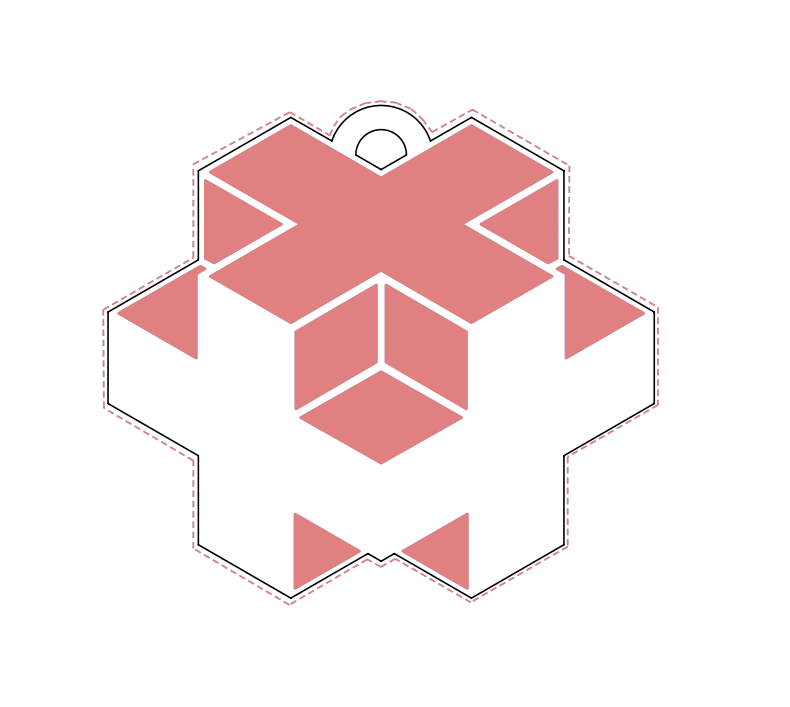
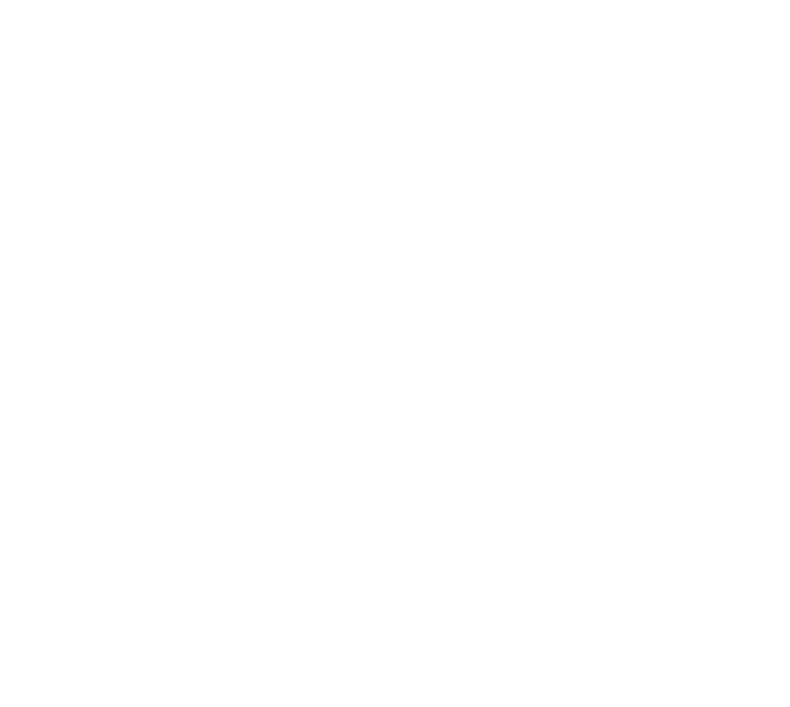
top zone outline: (380, 101) (364, 103) (350, 109) (341, 116) (329, 135) (289, 112) (193, 164) (193, 257) (103, 309) (103, 407) (193, 460) (193, 548) (289, 604) (367, 559) (380, 566) (395, 558) (470, 602) (567, 546) (567, 456) (658, 404) (658, 307) (568, 255) (569, 165) (472, 109) (432, 132) (411, 109) (395, 102) (380, 101) -> none
board edge: (290, 117) (198, 170) (198, 259) (108, 312) (108, 403) (198, 455) (198, 544) (290, 598) (367, 553) (381, 561) (394, 553) (471, 598) (563, 544) (563, 455) (654, 403) (654, 312) (563, 259) (563, 170) (471, 117) (430, 140) (421, 124) (411, 115) (400, 109) (387, 105) (368, 107) (350, 115) (341, 124) (331, 140) (290, 117) -> none
drawing: [117, 124, 646, 590] -> none
board edge: (355, 154) (381, 169) (406, 154) (404, 145) (399, 137) (390, 131) (381, 129) (371, 131) (363, 137) (357, 145) (355, 154) -> none

